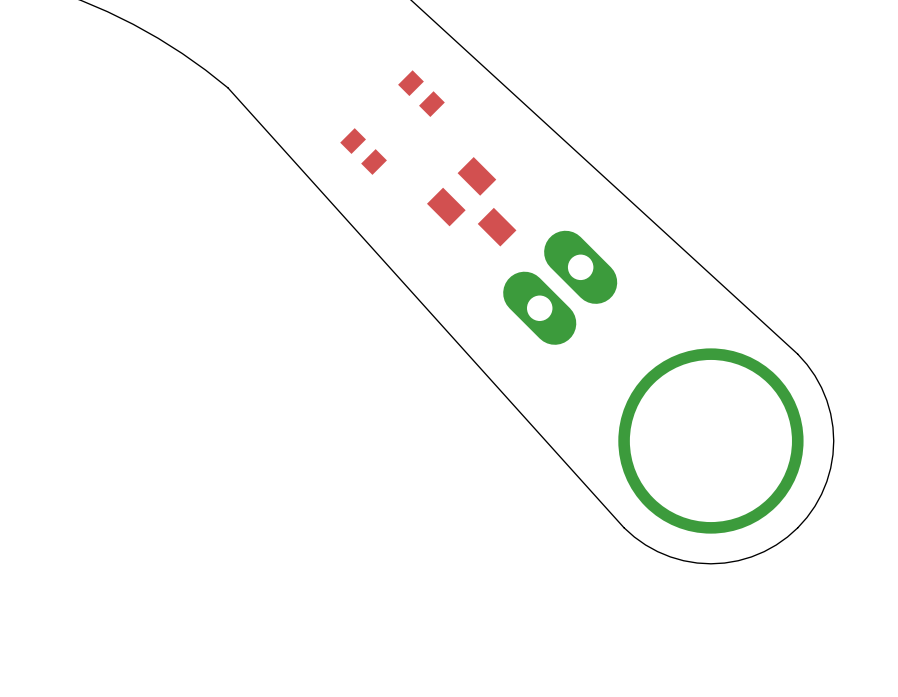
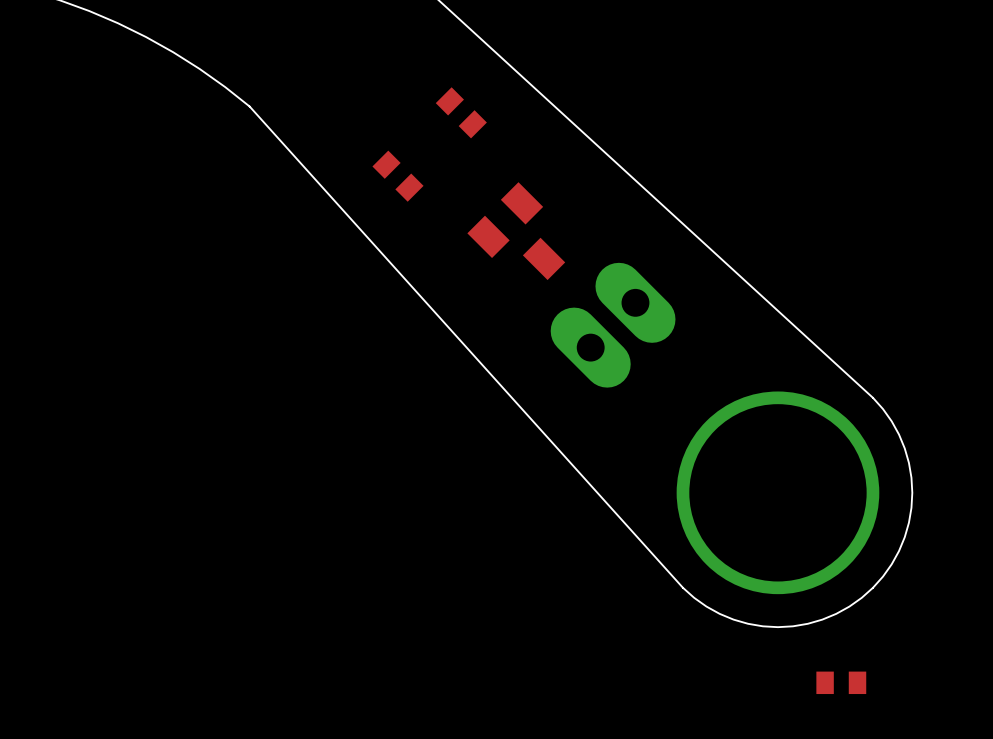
part: none -> (841, 682)

